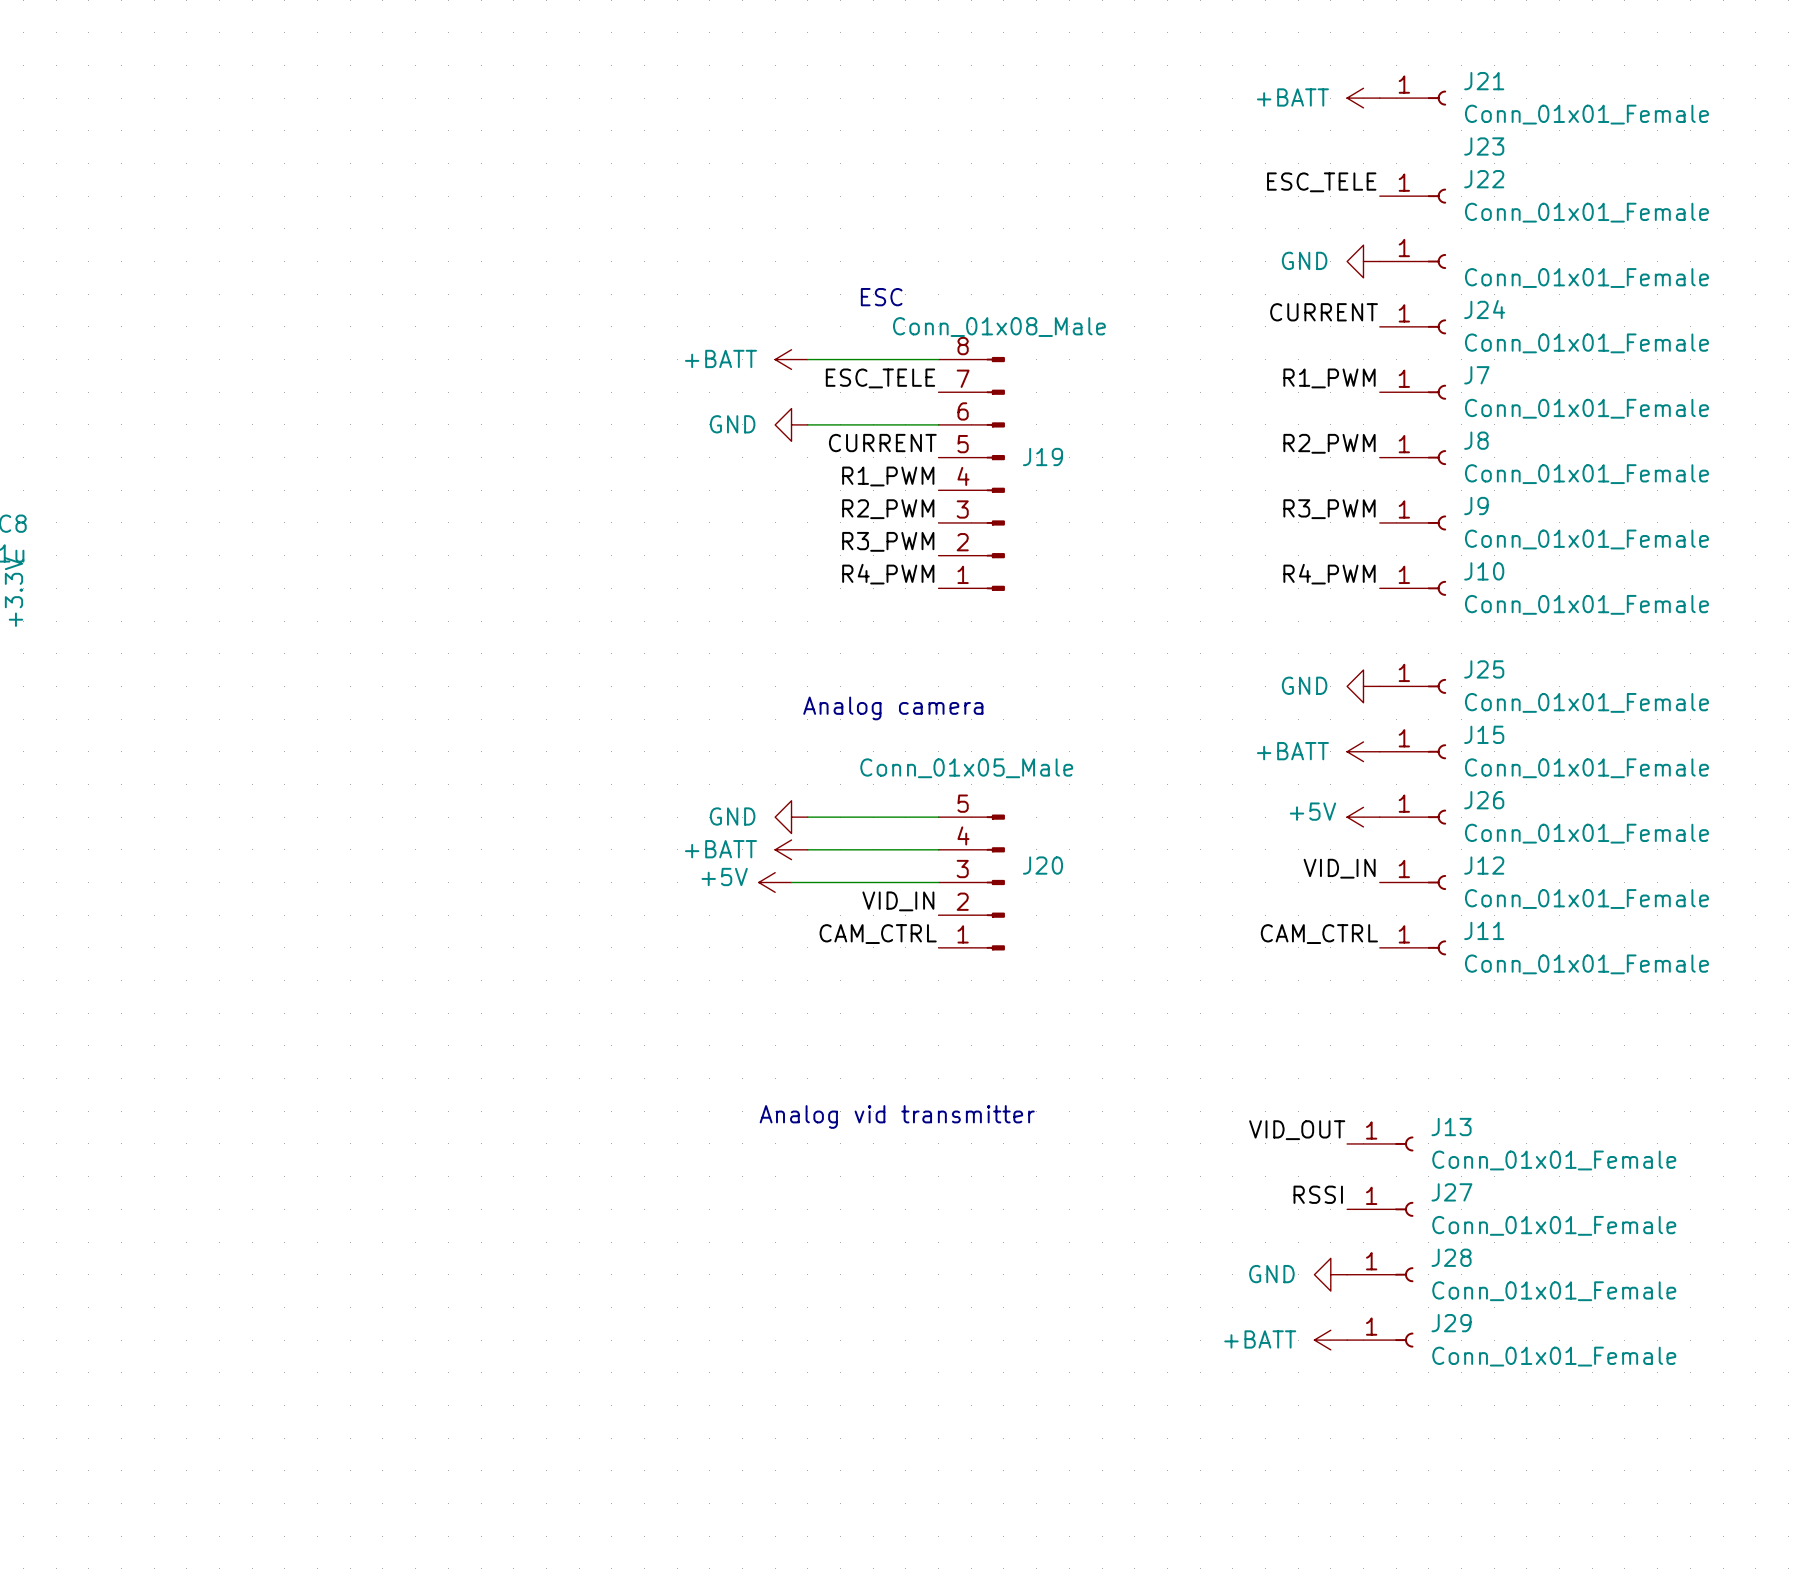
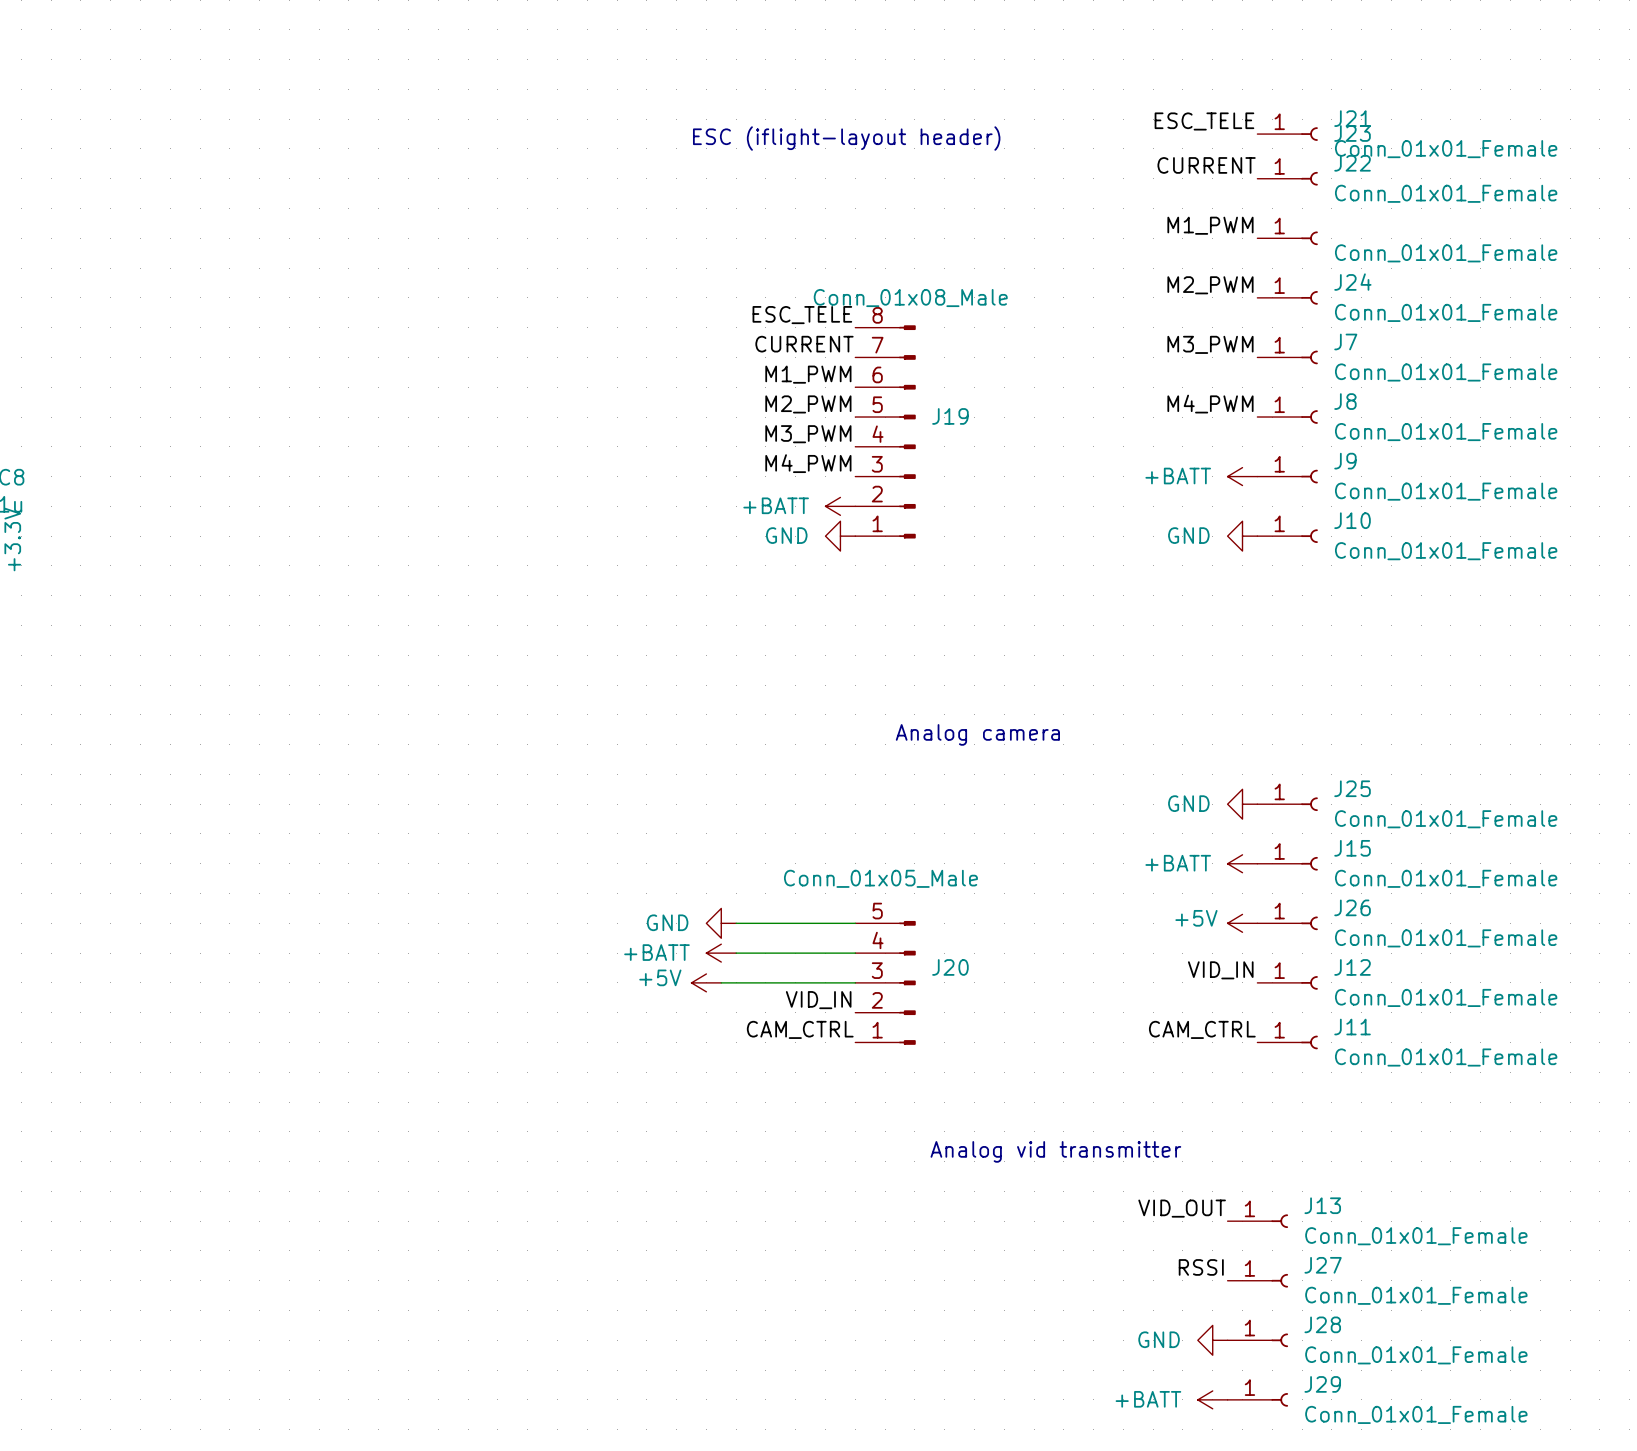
power symbol: +BATT (1363, 98) -> none
J21 position: (1413, 98) -> (1287, 134)
label: none -> ESC_TELE (1204, 121)
text: none -> ESC (iflight-layout header) (846, 138)
label: ESC_TELE (1321, 182) -> CURRENT (1206, 165)
label: none -> M1_PWM (1210, 225)
power symbol: GND (1363, 261) -> none
text: ESC (881, 297) -> none
label: CURRENT (1324, 312) -> M2_PWM (1210, 285)
label: none -> ESC_TELE (802, 315)
power symbol: +BATT (791, 359) -> none
wire: (807, 359) (938, 359) -> none
label: ESC_TELE (880, 378) -> CURRENT (804, 344)
label: R1_PWM (1329, 378) -> M3_PWM (1210, 344)
label: none -> M1_PWM (808, 374)
power symbol: GND (791, 424) -> none
wire: (807, 424) (938, 424) -> none
label: CURRENT (882, 443) -> M2_PWM (808, 404)
label: R2_PWM (1329, 443) -> M4_PWM (1210, 404)
label: R1_PWM (888, 476) -> M3_PWM (808, 434)
label: R2_PWM (888, 509) -> M4_PWM (808, 463)
label: R3_PWM (1329, 509) -> none
power symbol: none -> +BATT (1242, 476)
label: R3_PWM (888, 541) -> none
power symbol: none -> +BATT (840, 506)
label: R4_PWM (888, 574) -> none
label: R4_PWM (1329, 574) -> none
power symbol: none -> GND (840, 536)
power symbol: none -> GND (1242, 536)
power symbol: GND (1363, 686) -> none
J25: Conn_01x01_Female (1413, 686) -> none
text position: Analog camera (893, 708) -> Analog camera (977, 734)
power symbol: +BATT (1363, 751) -> none
J15: Conn_01x01_Female (1413, 751) -> none
power symbol: GND (791, 817) -> none
wire: (807, 817) (938, 817) -> (736, 923) (855, 923)
power symbol position: +5V (1363, 817) -> +5V (1242, 923)
J26 position: (1413, 817) -> (1287, 923)
power symbol: +BATT (791, 849) -> none
wire: (807, 849) (938, 849) -> (736, 953) (855, 953)
J12 name: J12 (1484, 865) -> J25 (1352, 788)
label position: VID_IN (1339, 868) -> VID_IN (1220, 970)
power symbol position: +5V (775, 882) -> +5V (706, 982)
wire: (791, 882) (938, 882) -> (721, 982) (855, 982)
J20 position: (971, 882) -> (885, 982)
power symbol: none -> GND (1242, 804)
label position: VID_IN (898, 901) -> VID_IN (818, 1000)
J11 name: J11 (1484, 930) -> J15 (1352, 848)
label position: CAM_CTRL (878, 934) -> CAM_CTRL (800, 1029)
label position: CAM_CTRL (1319, 934) -> CAM_CTRL (1202, 1029)
power symbol: none -> +BATT (1242, 863)
power symbol: none -> GND (721, 923)
power symbol: none -> +BATT (721, 953)
J12: none -> Conn_01x01_Female (1287, 982)
text position: Analog vid transmitter (897, 1116) -> Analog vid transmitter (1055, 1151)
label position: VID_OUT (1297, 1130) -> VID_OUT (1182, 1208)
J13: Conn_01x01_Female (1380, 1143) -> none
J11: none -> Conn_01x01_Female (1287, 1042)
label position: RSSI (1318, 1194) -> RSSI (1201, 1267)
J27 position: (1380, 1209) -> (1257, 1280)
power symbol position: GND (1330, 1274) -> GND (1212, 1340)
J28 position: (1380, 1274) -> (1257, 1340)
J29 name: J29 (1451, 1323) -> J13 (1322, 1205)
power symbol position: +BATT (1330, 1340) -> +BATT (1212, 1399)
J29: none -> Conn_01x01_Female (1257, 1399)

